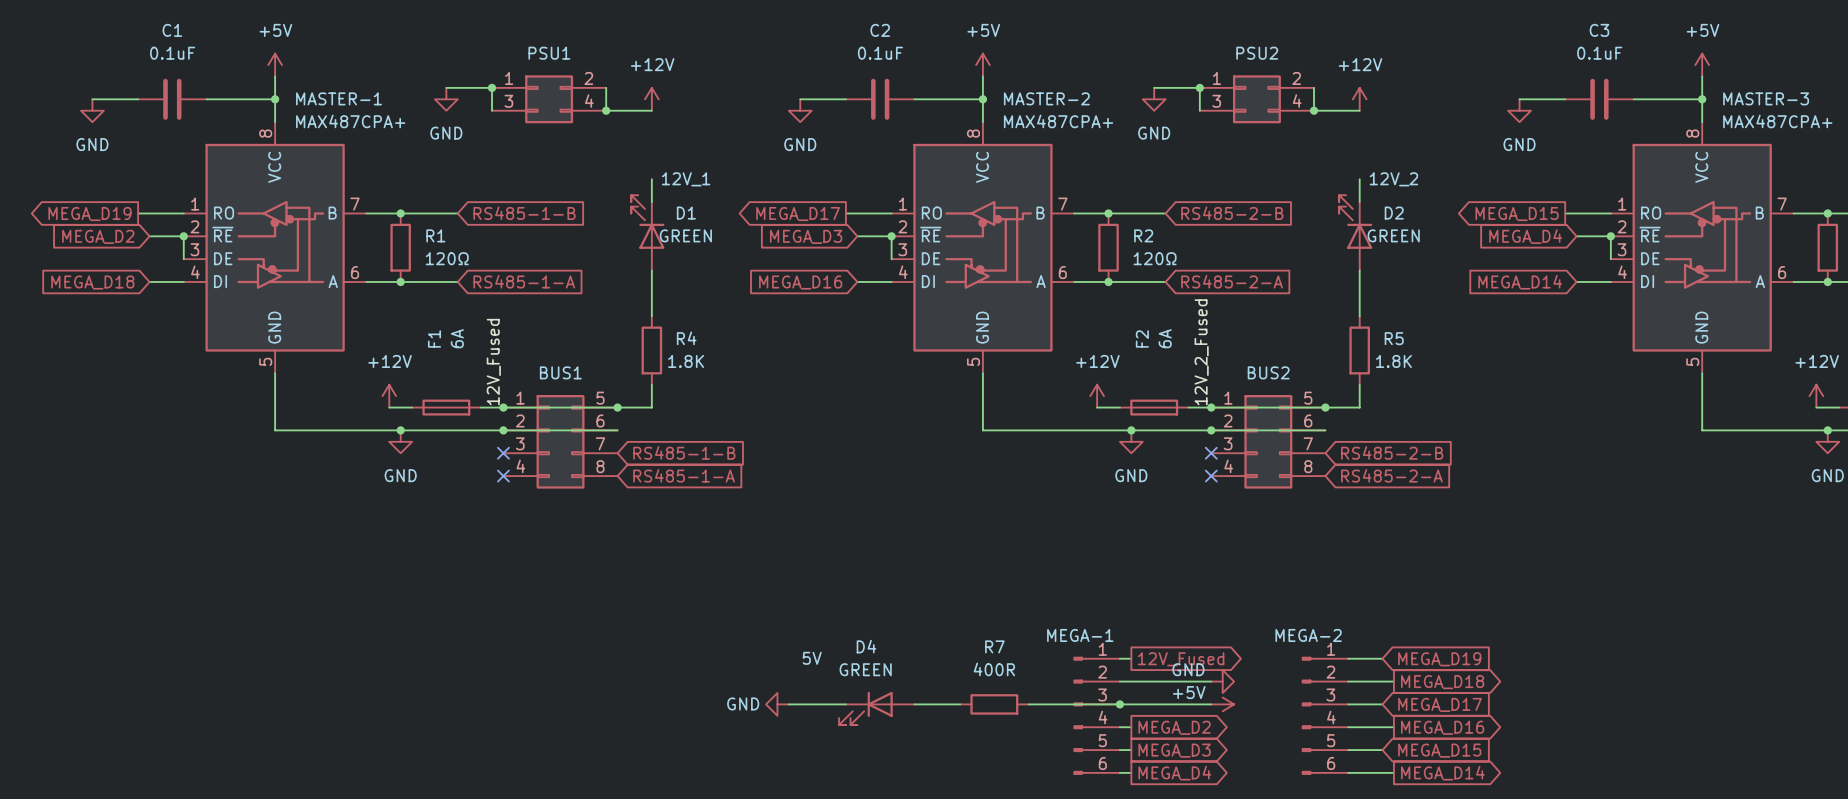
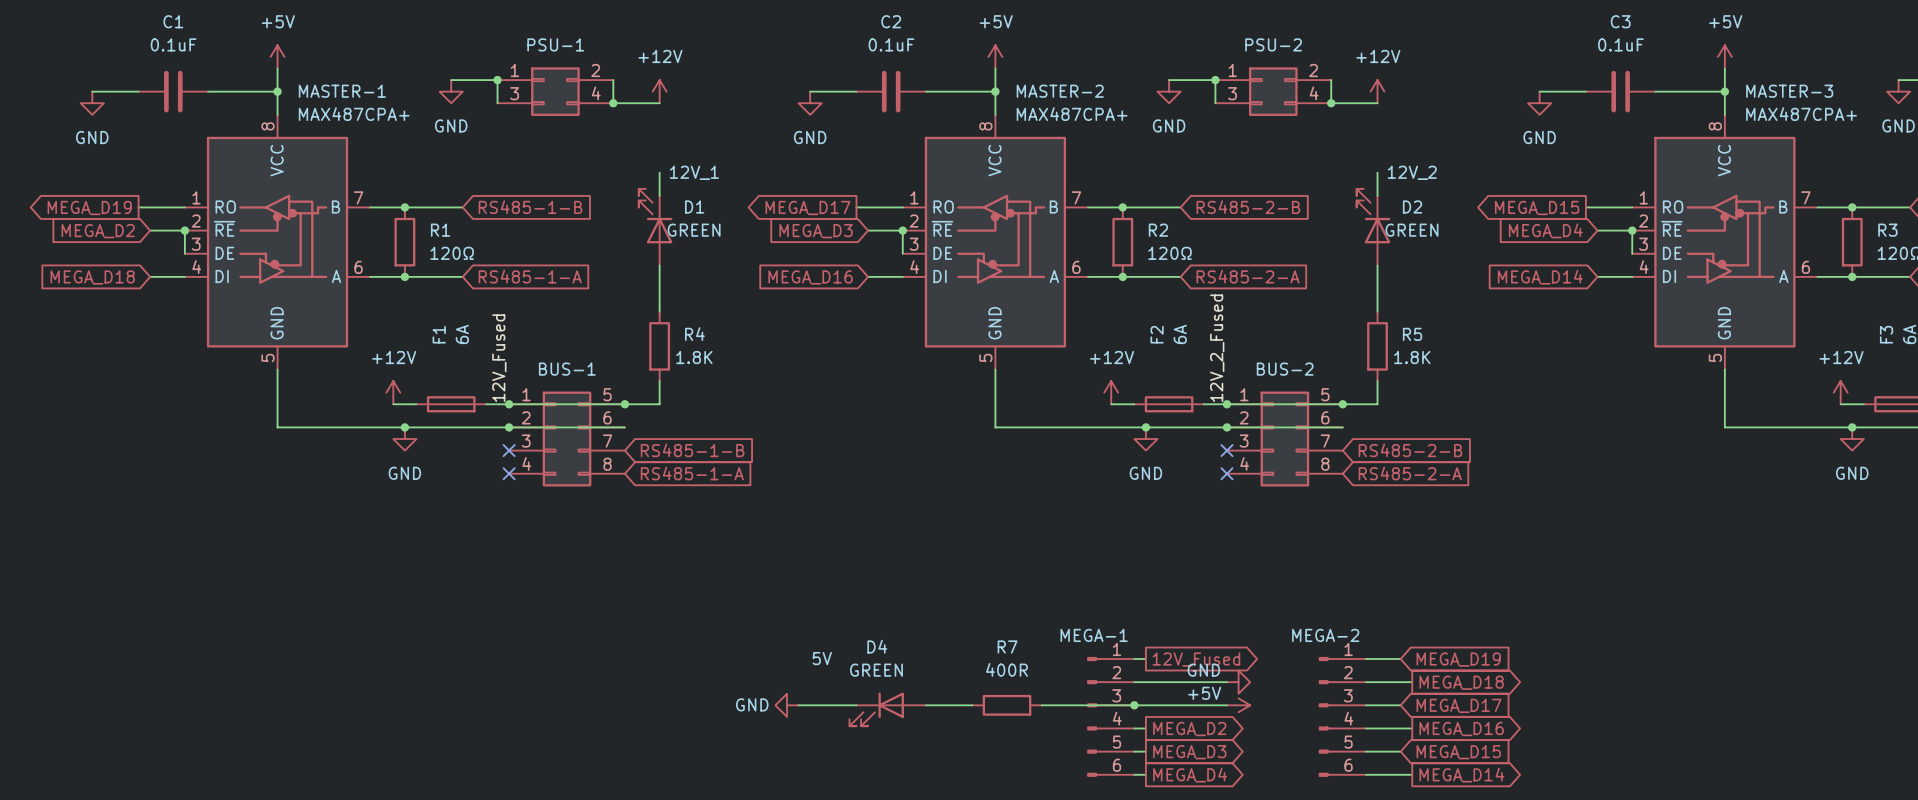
PSU1 name: PSU1 (549, 53) -> PSU-1 (555, 44)
PSU2 name: PSU2 (1257, 53) -> PSU-2 (1273, 44)
BUS1 name: BUS1 (560, 372) -> BUS-1 (567, 369)
BUS2 name: BUS2 (1268, 372) -> BUS-2 (1285, 369)

